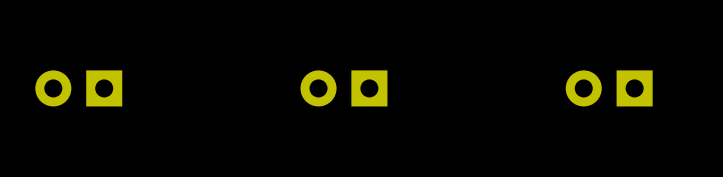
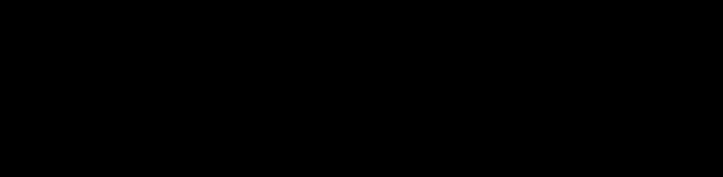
part: (78, 88) -> none
part: (343, 88) -> none
part: (609, 88) -> none

